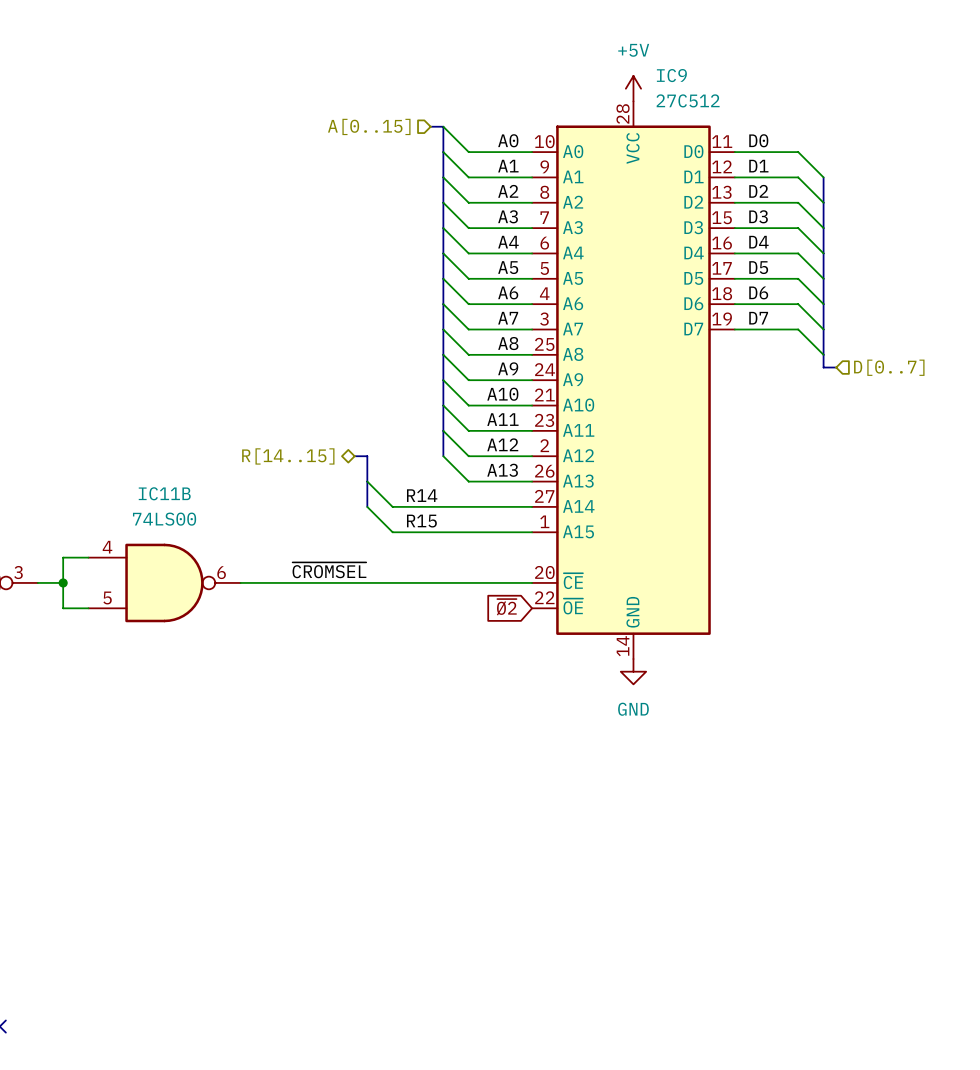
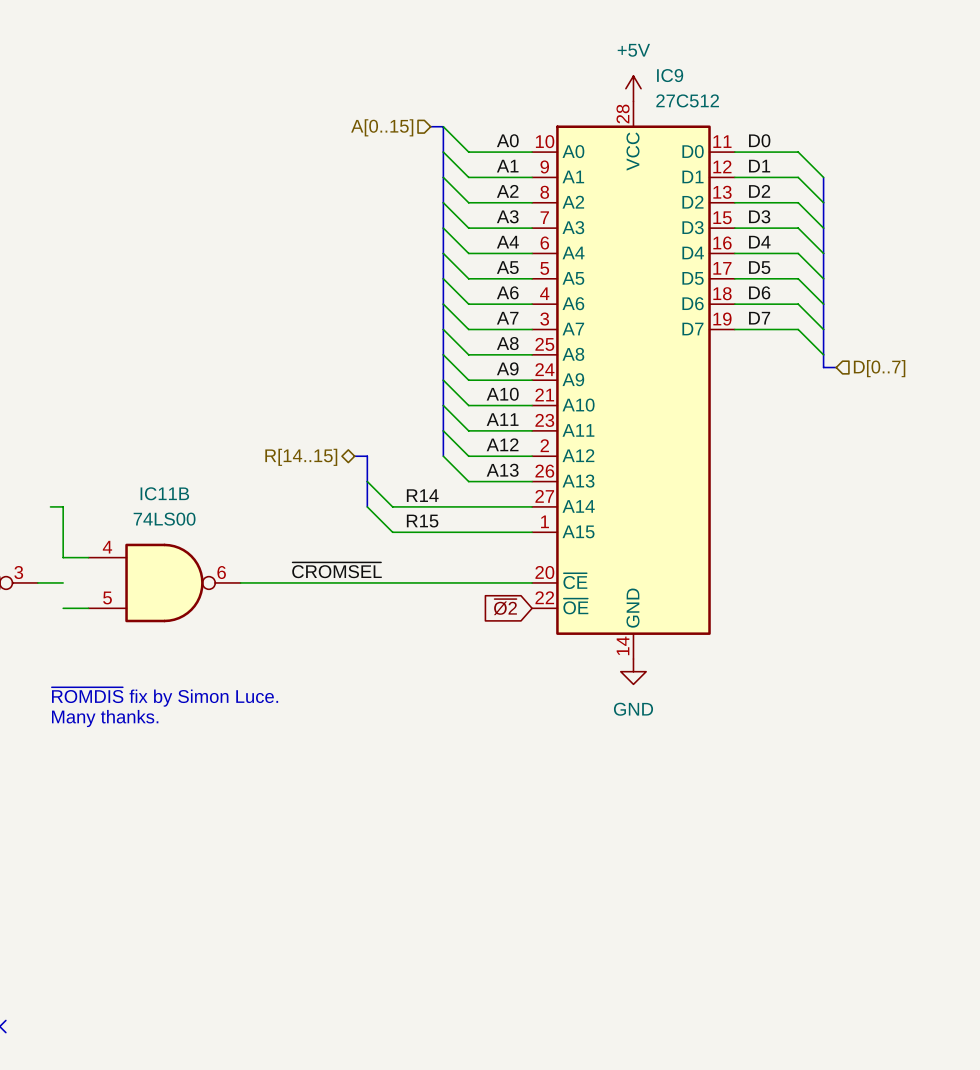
wire: (63, 557) (63, 608) -> (63, 557) (63, 506) (50, 506)
junction: (63, 582) -> none
text: none -> ~{ROMDIS} fix by Simon Luce. (164, 696)
text: none -> Many thanks. (105, 718)

